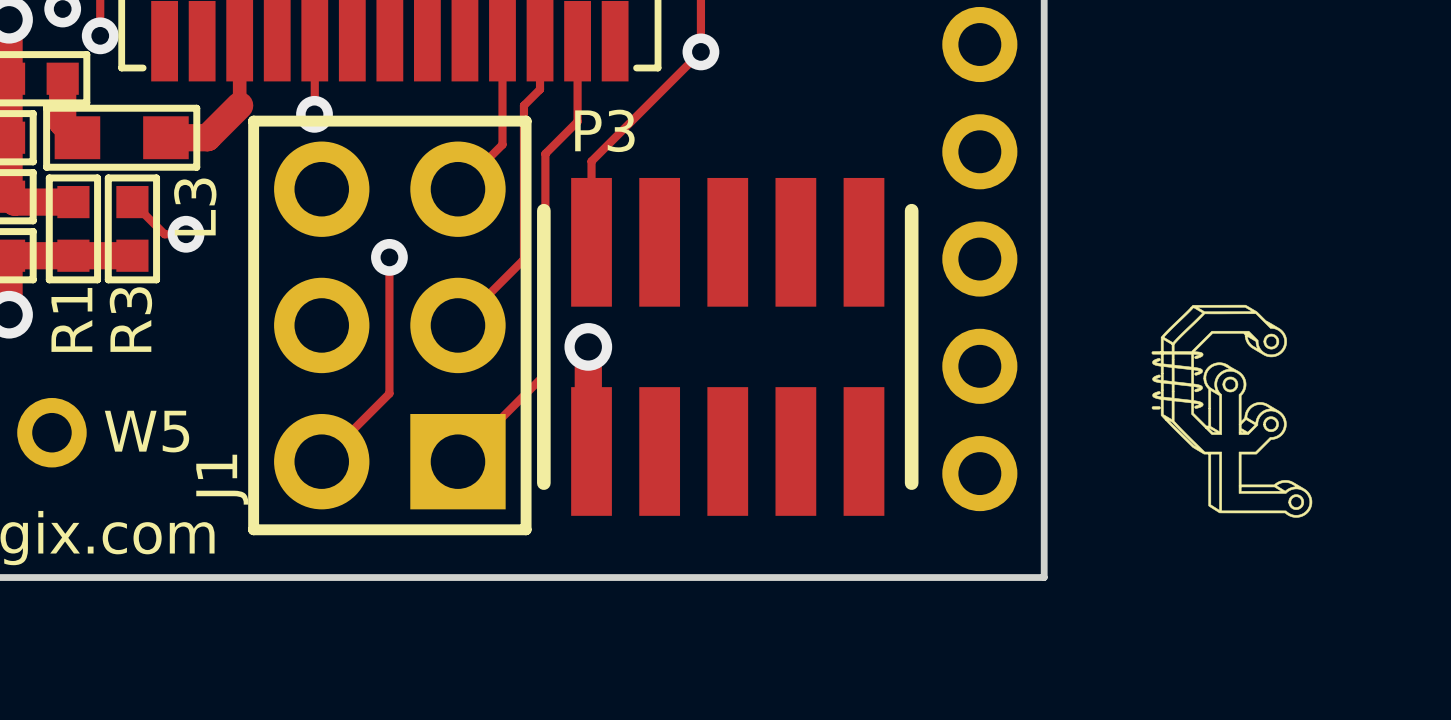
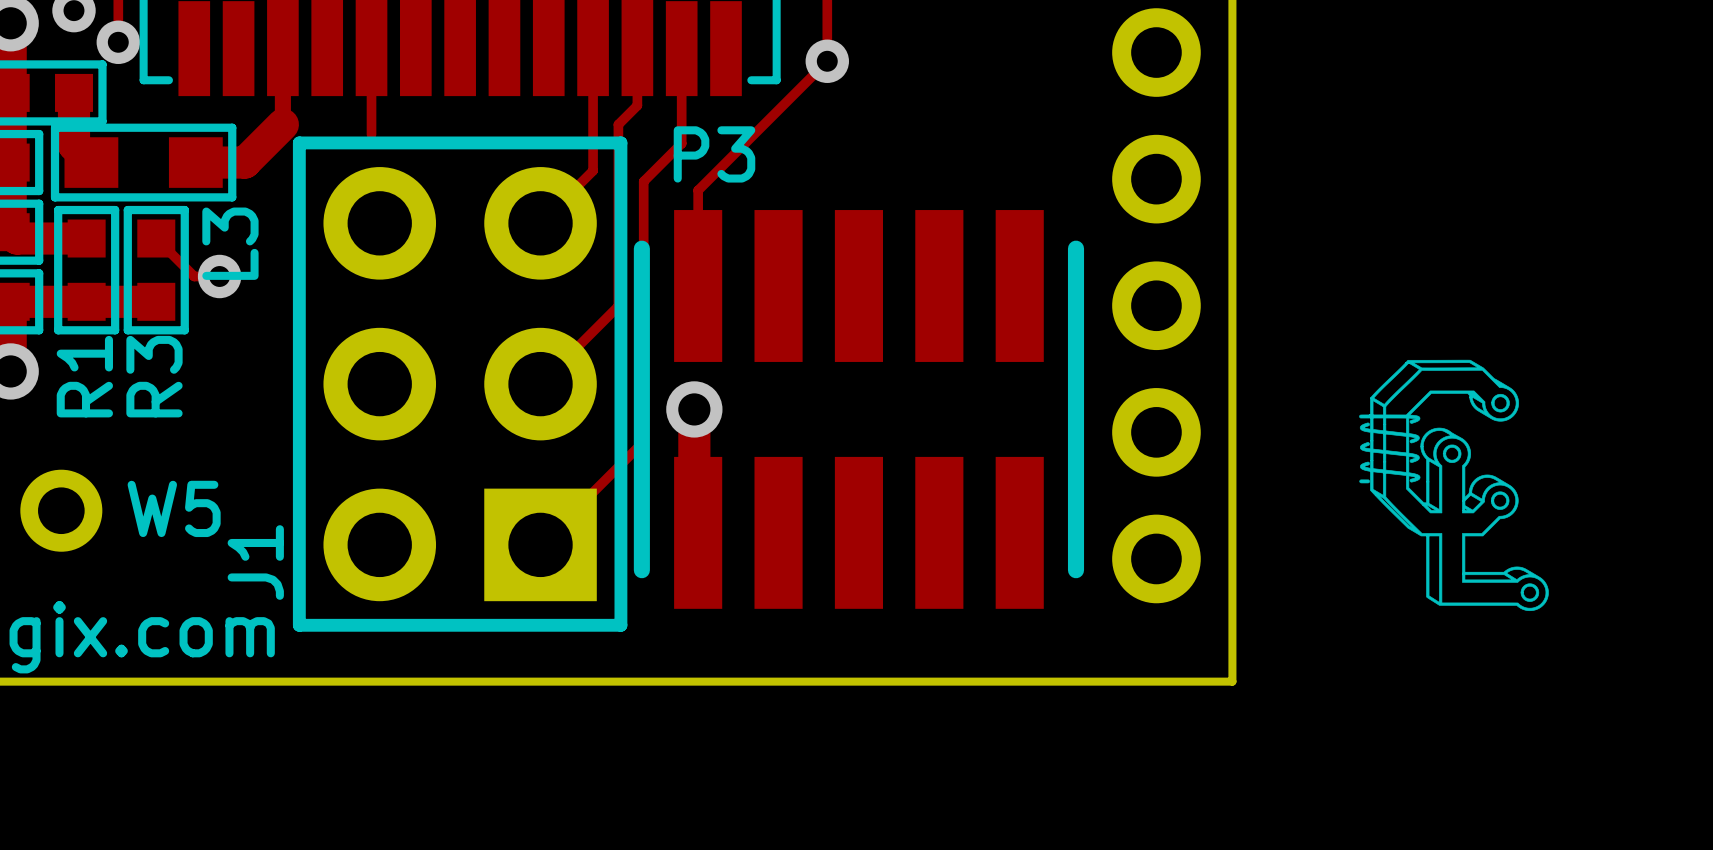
via: (314, 114) -> none
track: (389, 257) (389, 393) (321, 461) -> none
via: (389, 257) -> none

